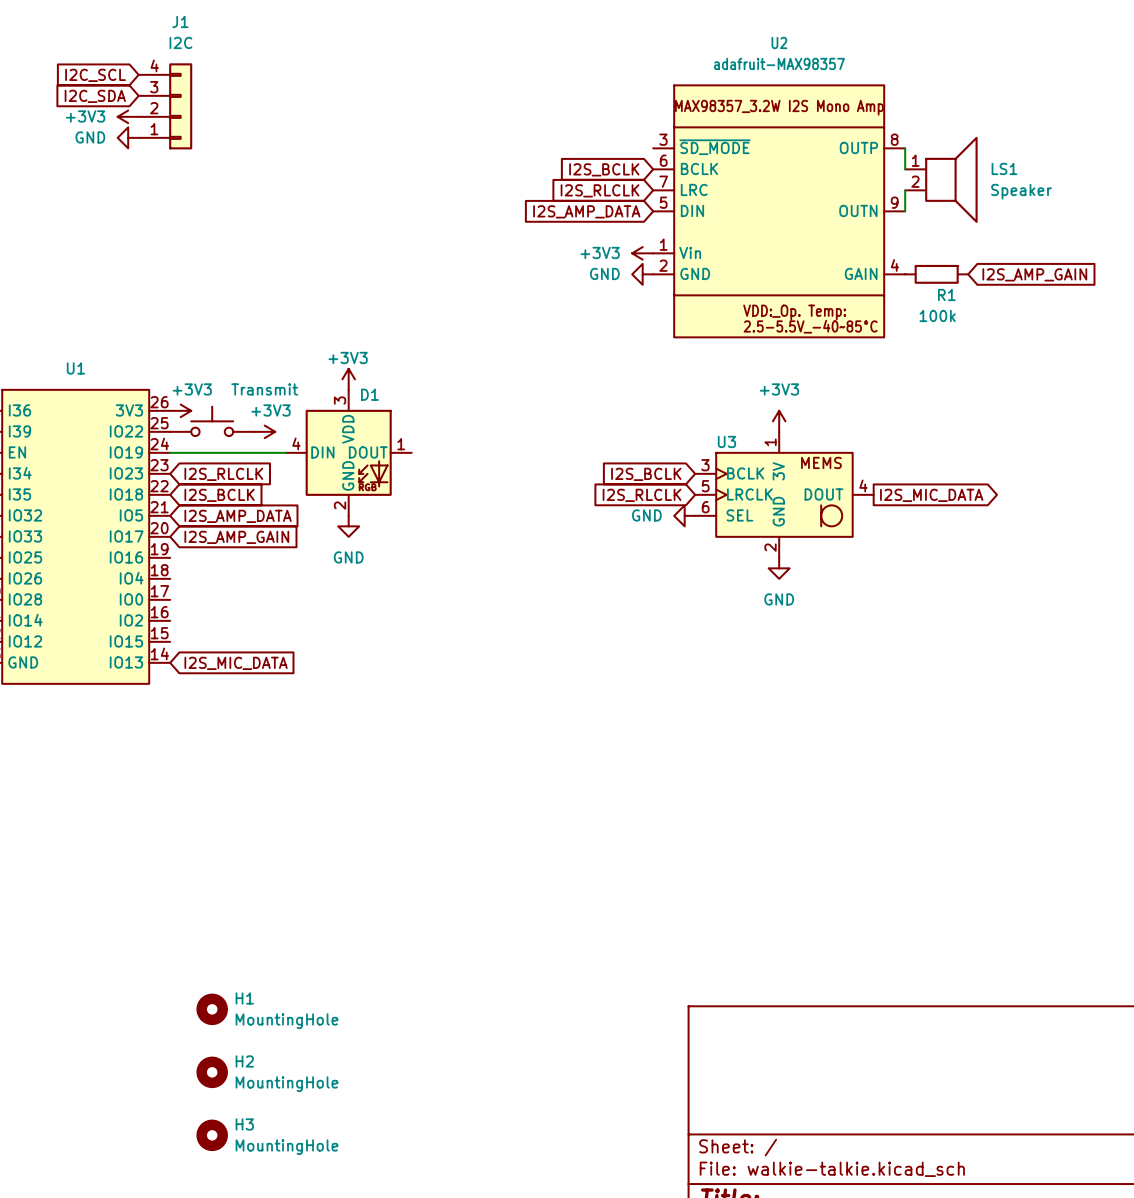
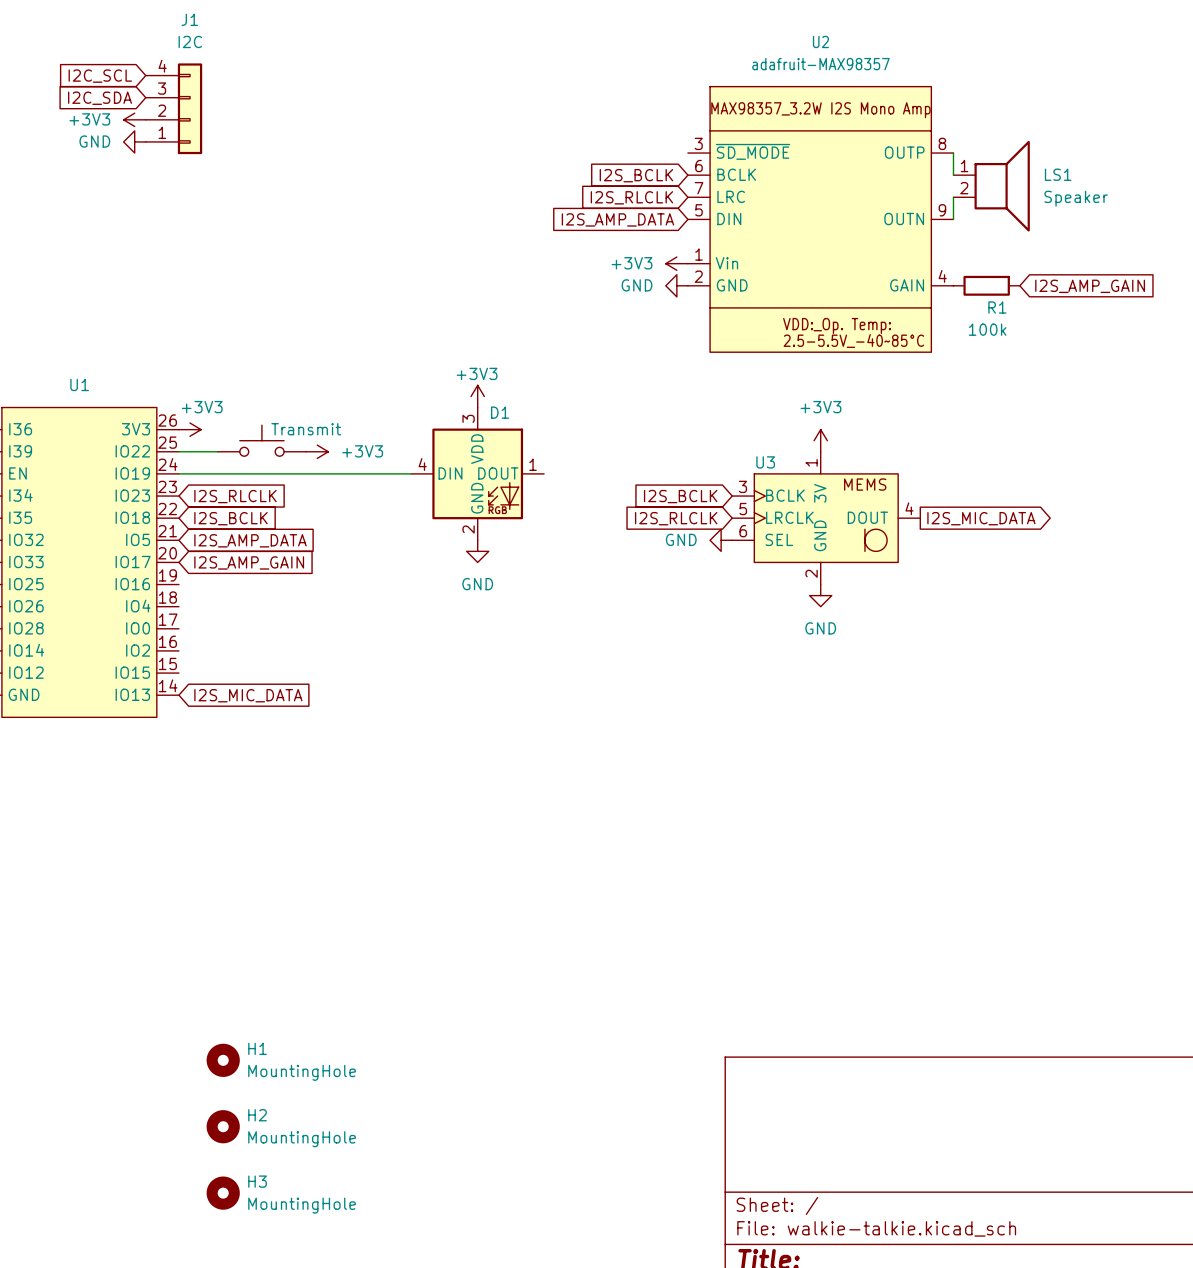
power symbol: +3V3 (348, 379) -> none
power symbol: none -> +3V3 (477, 396)
part value position: Transmit (264, 389) -> Transmit (306, 429)
part position: (212, 421) -> (261, 440)
power symbol: +3V3 (264, 431) -> none
power symbol: none -> +3V3 (317, 451)
D1 position: (348, 452) -> (477, 473)
power symbol position: GND (348, 526) -> GND (477, 551)

